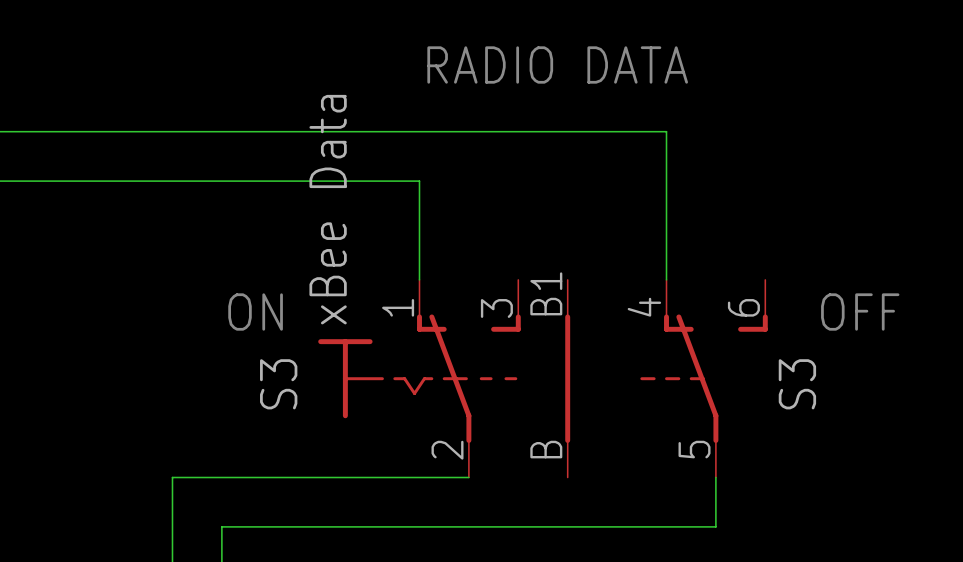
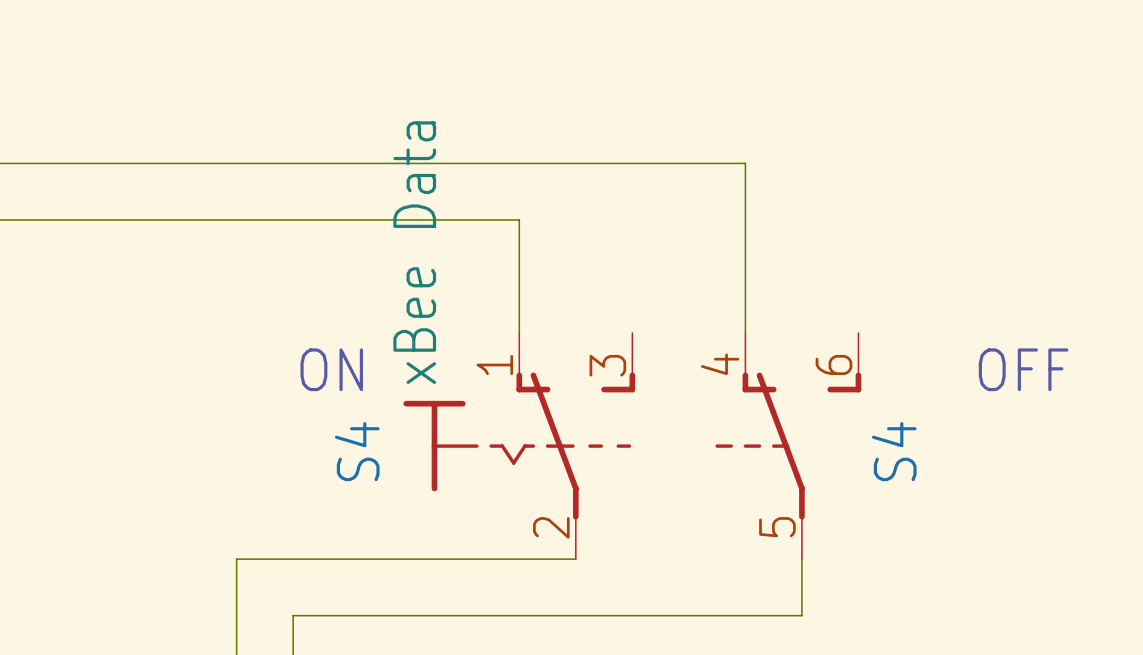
text: RADIO DATA (557, 65) -> none
wire: (617, 131) (666, 131) (666, 279) -> (745, 163) (745, 333)
S4: none -> xBee Data (519, 446)
S3: xBee Data (444, 378) -> none
S4: none -> (788, 446)
S3: (704, 378) -> none
wire: (715, 477) (715, 526) (666, 526) -> (801, 559) (801, 615)

